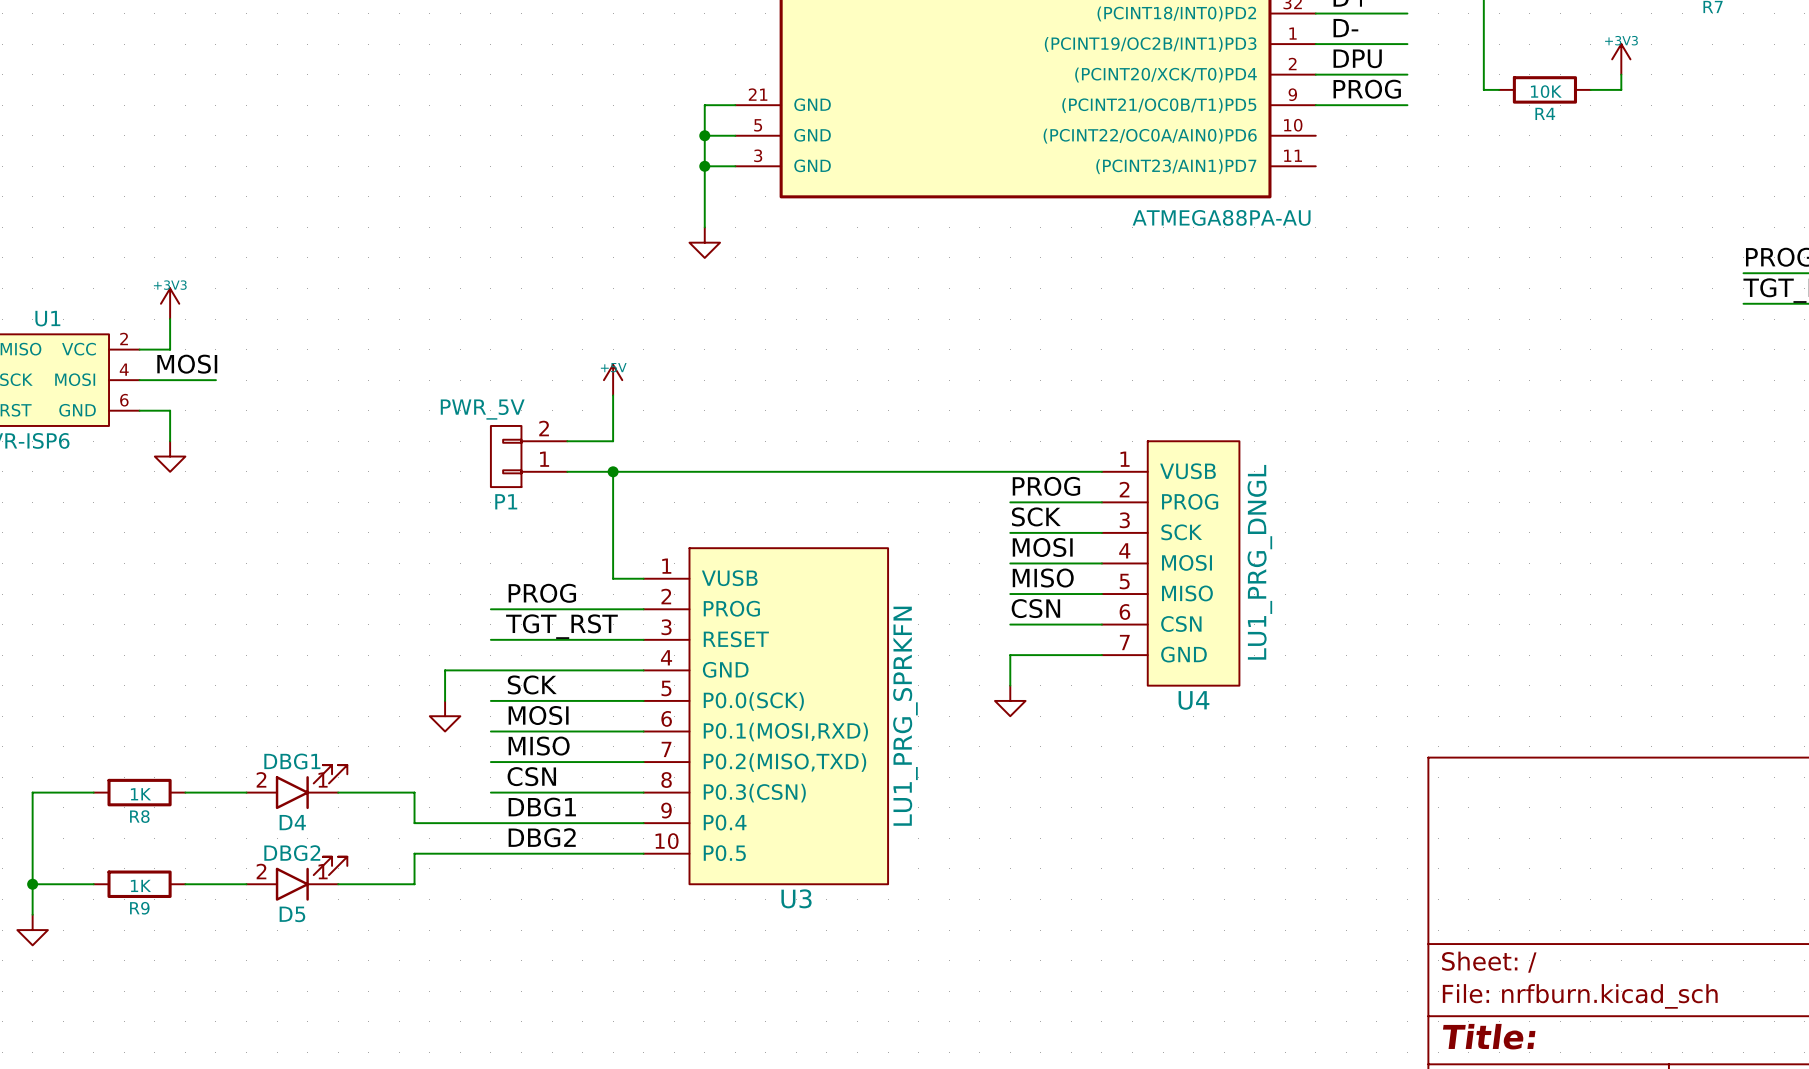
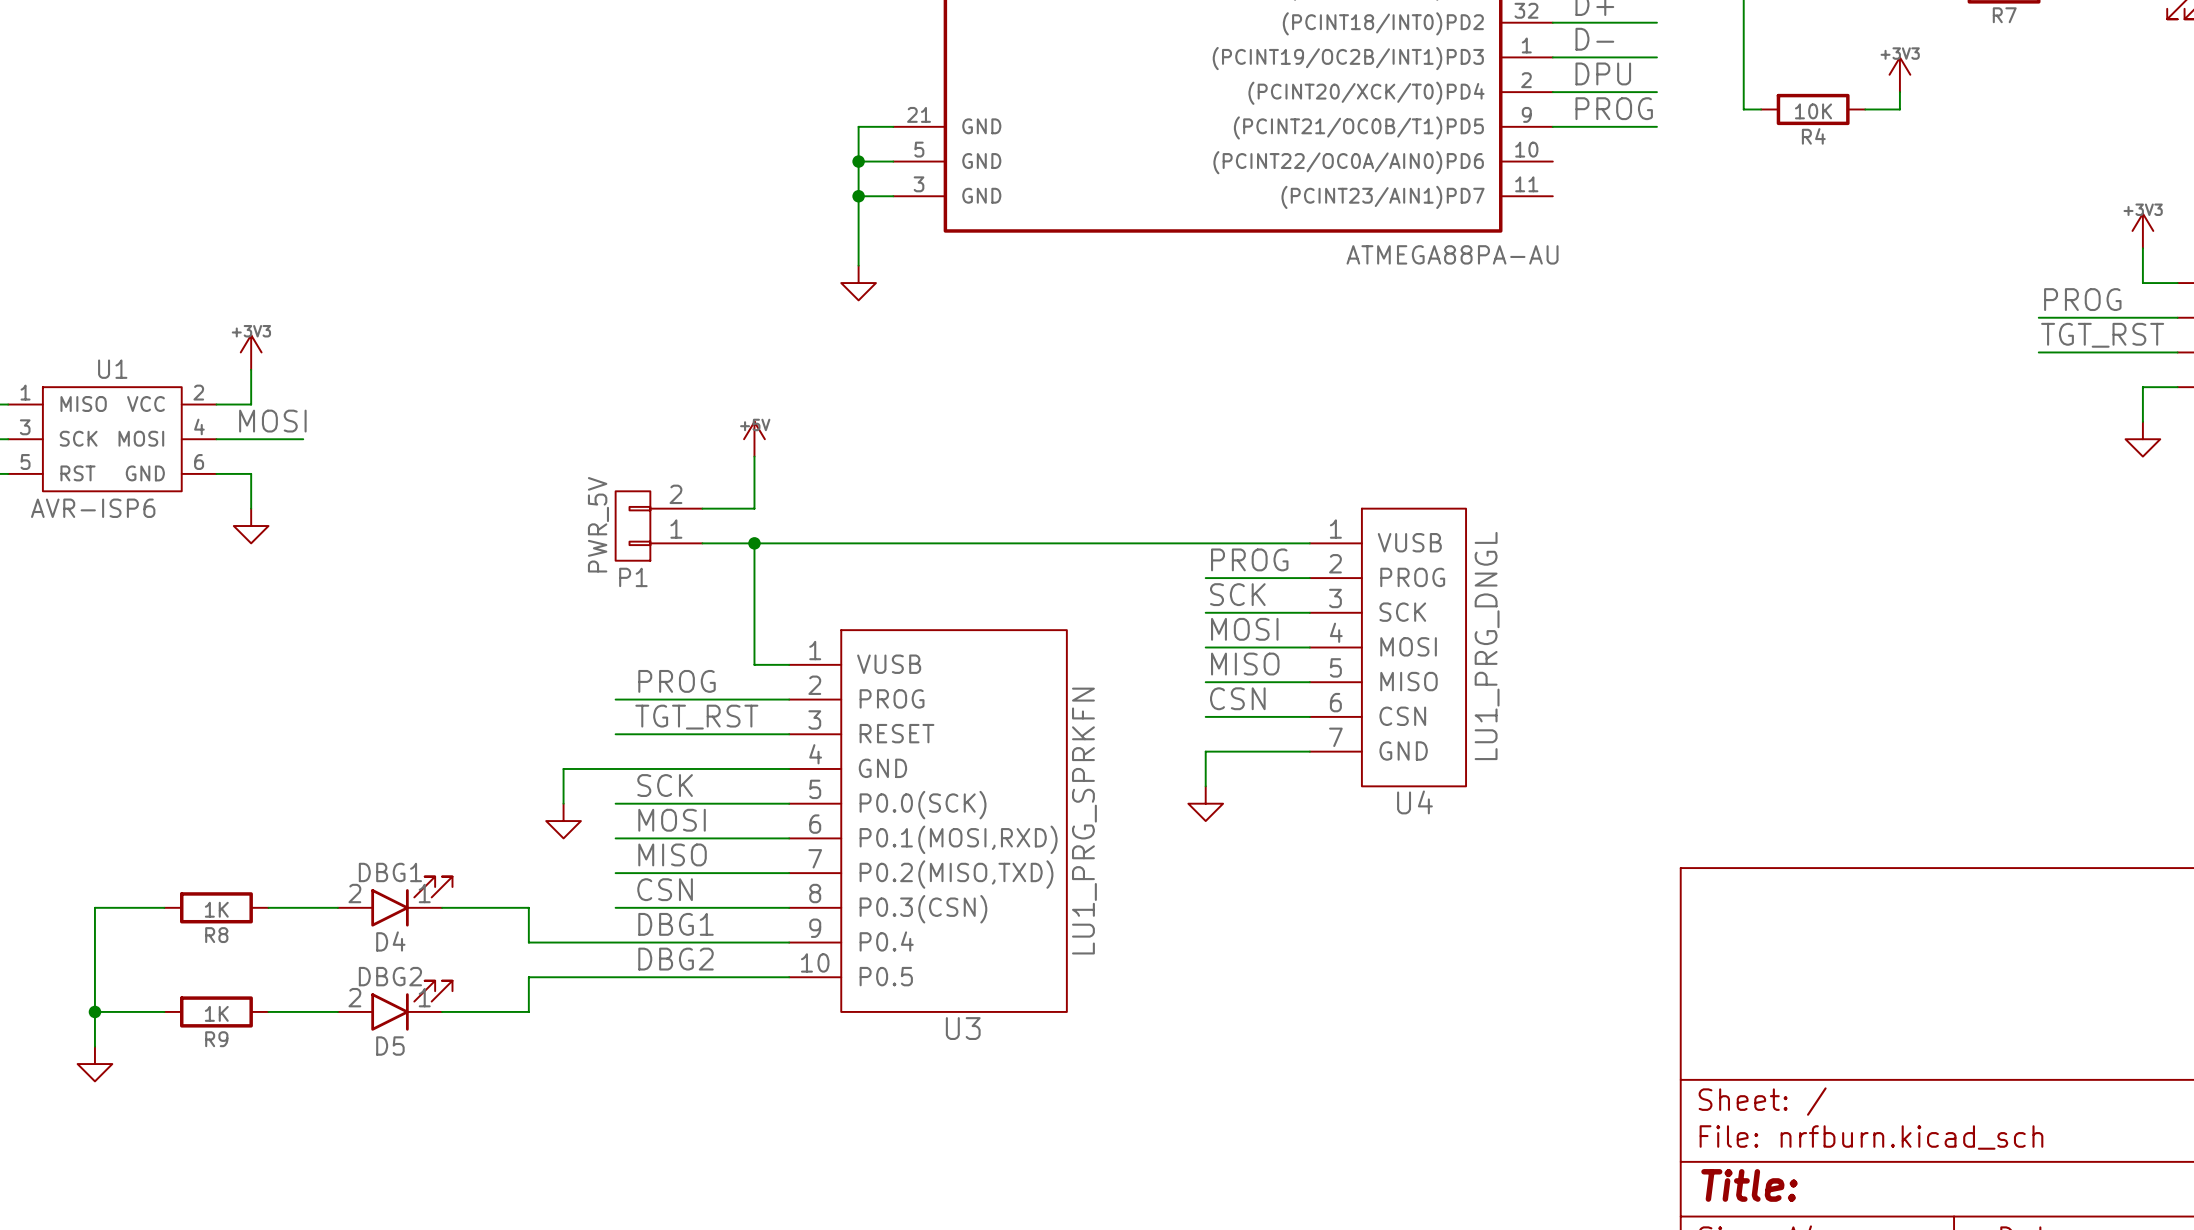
P1 value rotation: 0° (482, 409) -> 90° counterclockwise (598, 524)

